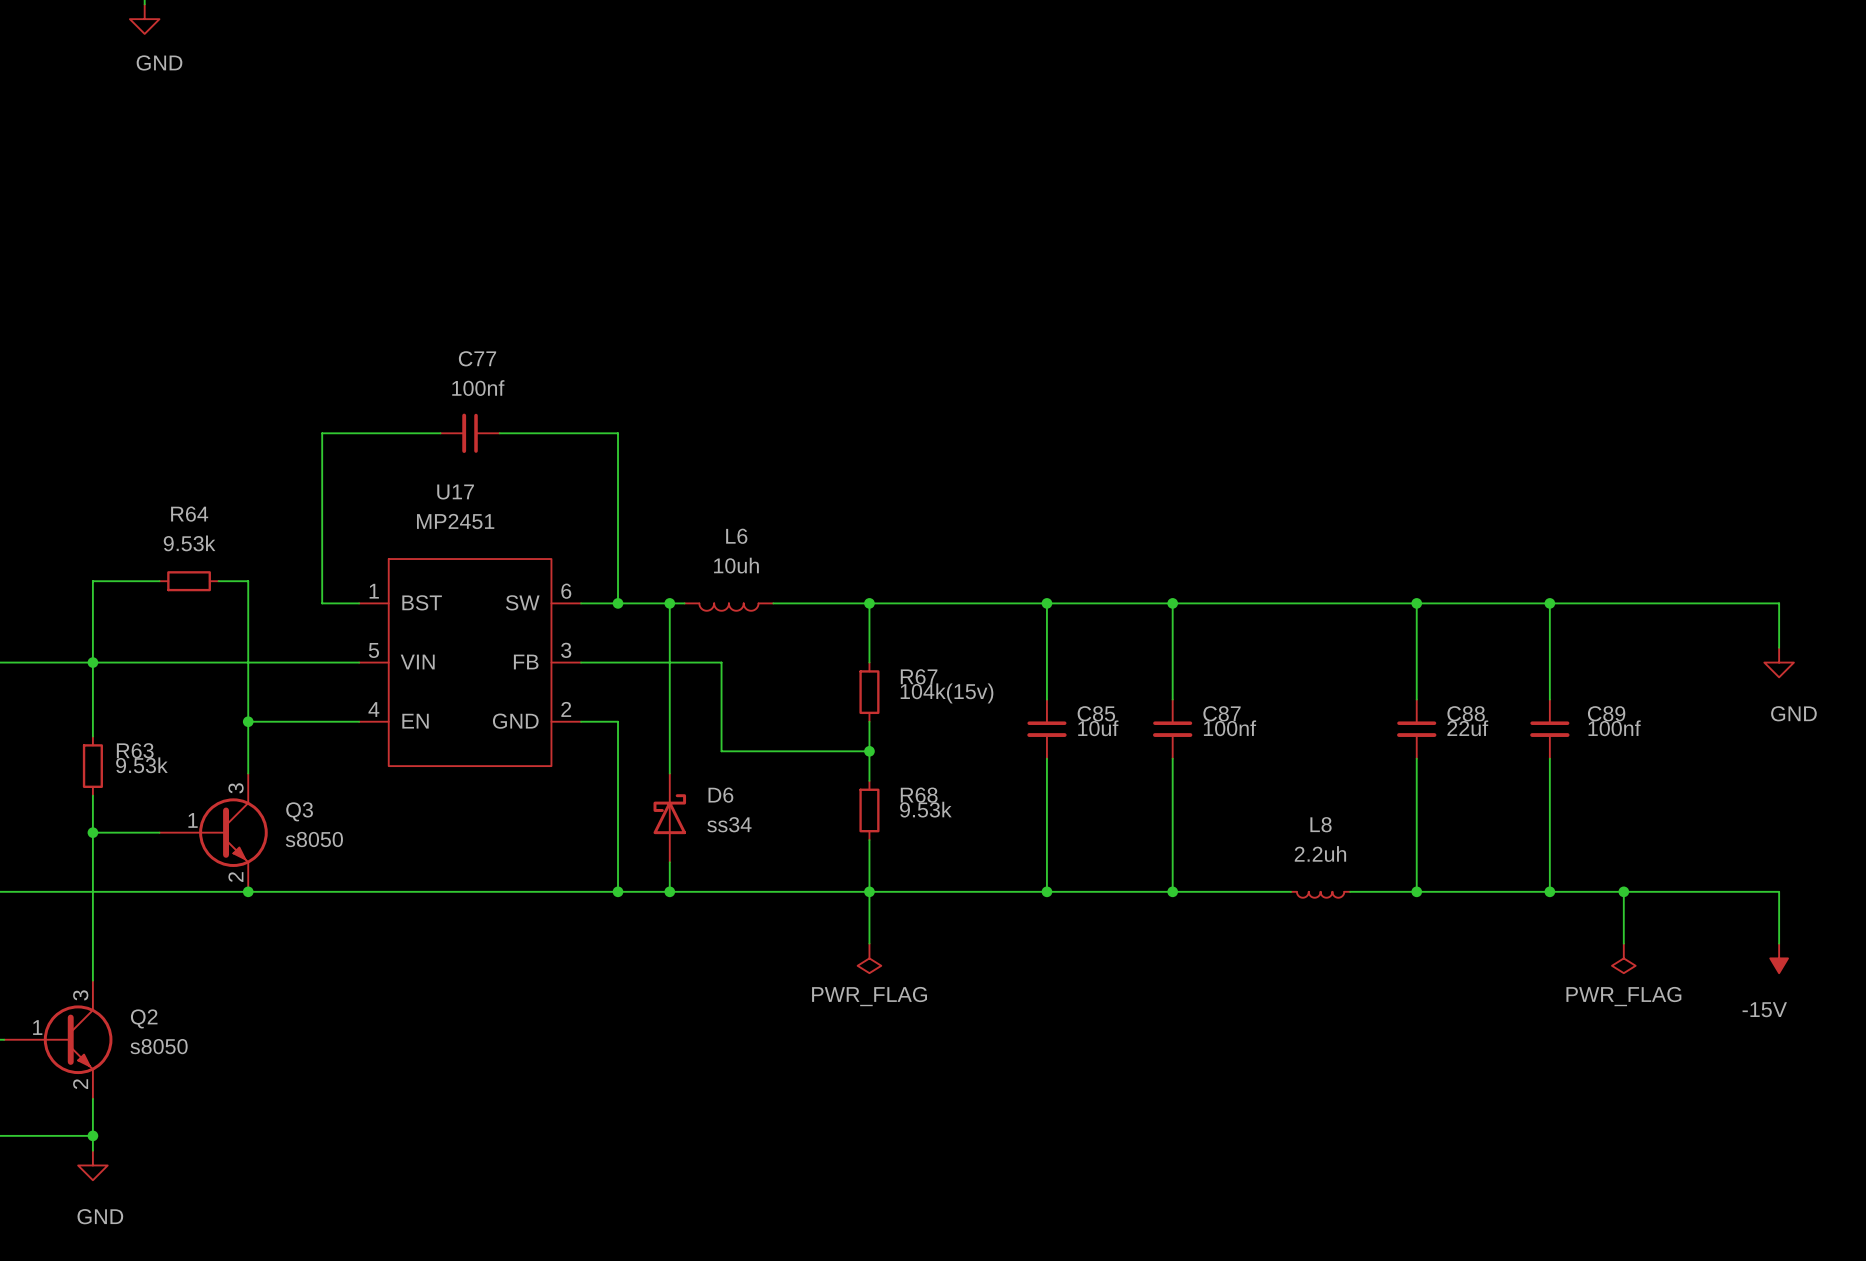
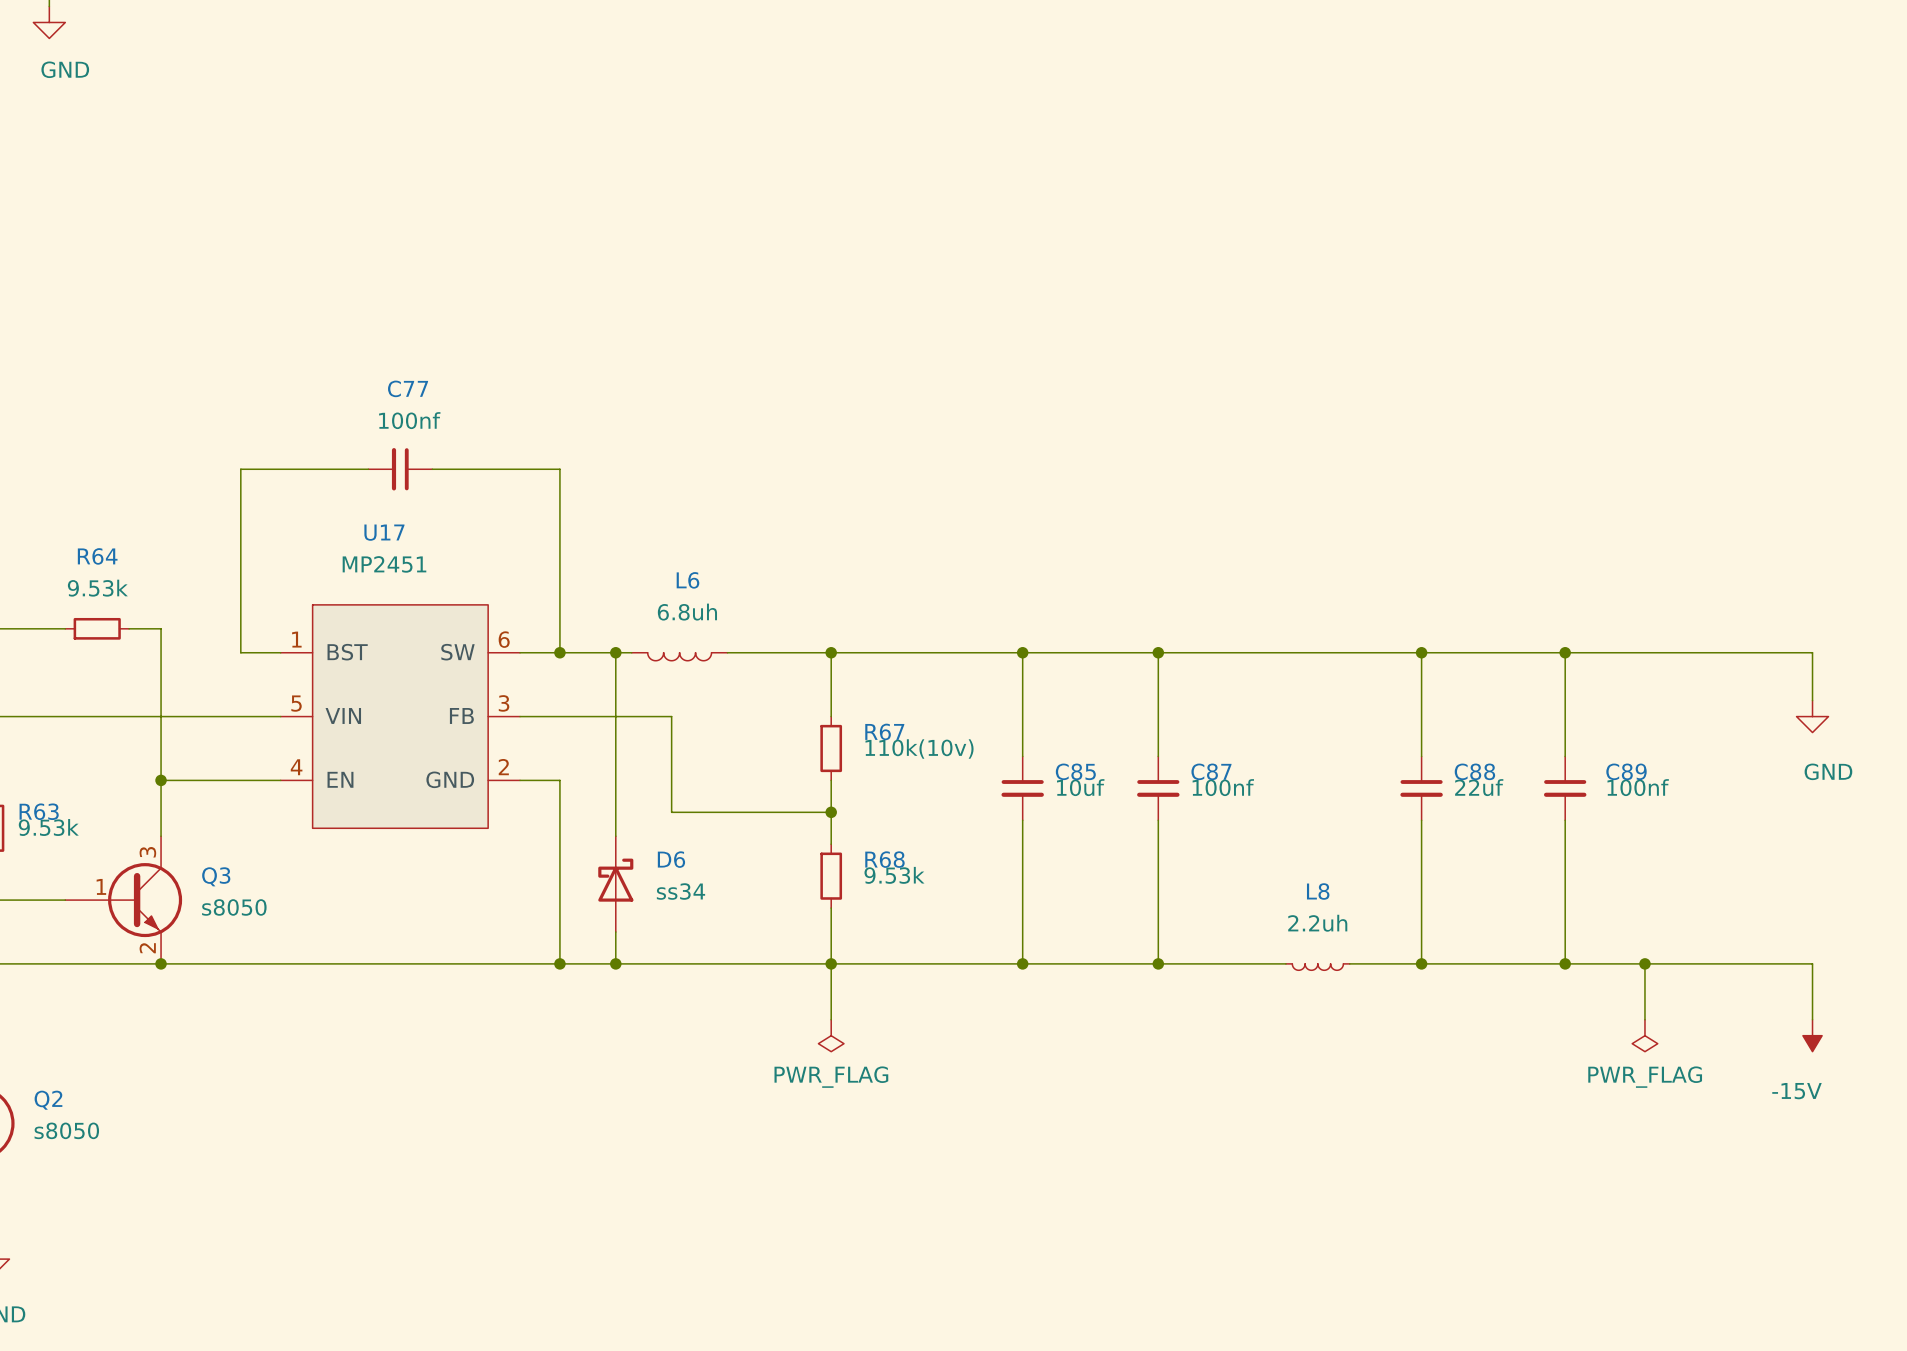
L6 value: 10uh (736, 565) -> 6.8uh (687, 612)
R67 value: 104k(15v) (947, 693) -> 110k(10v) (919, 749)

